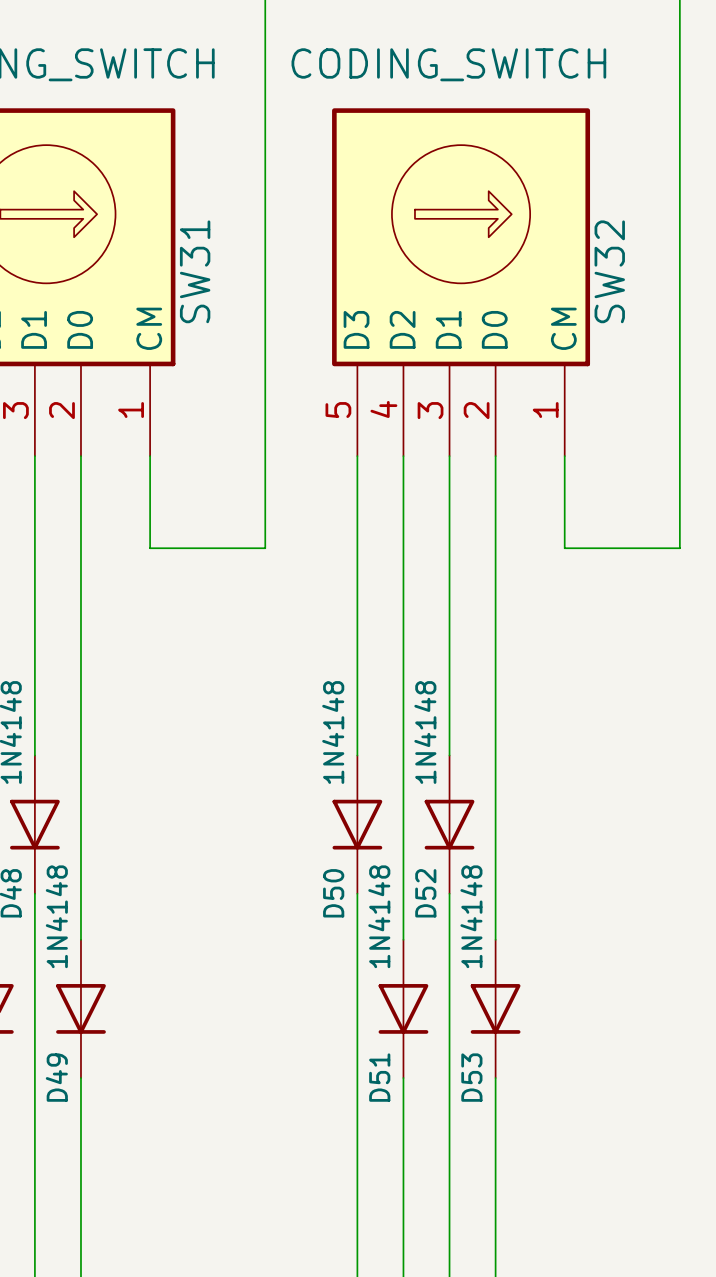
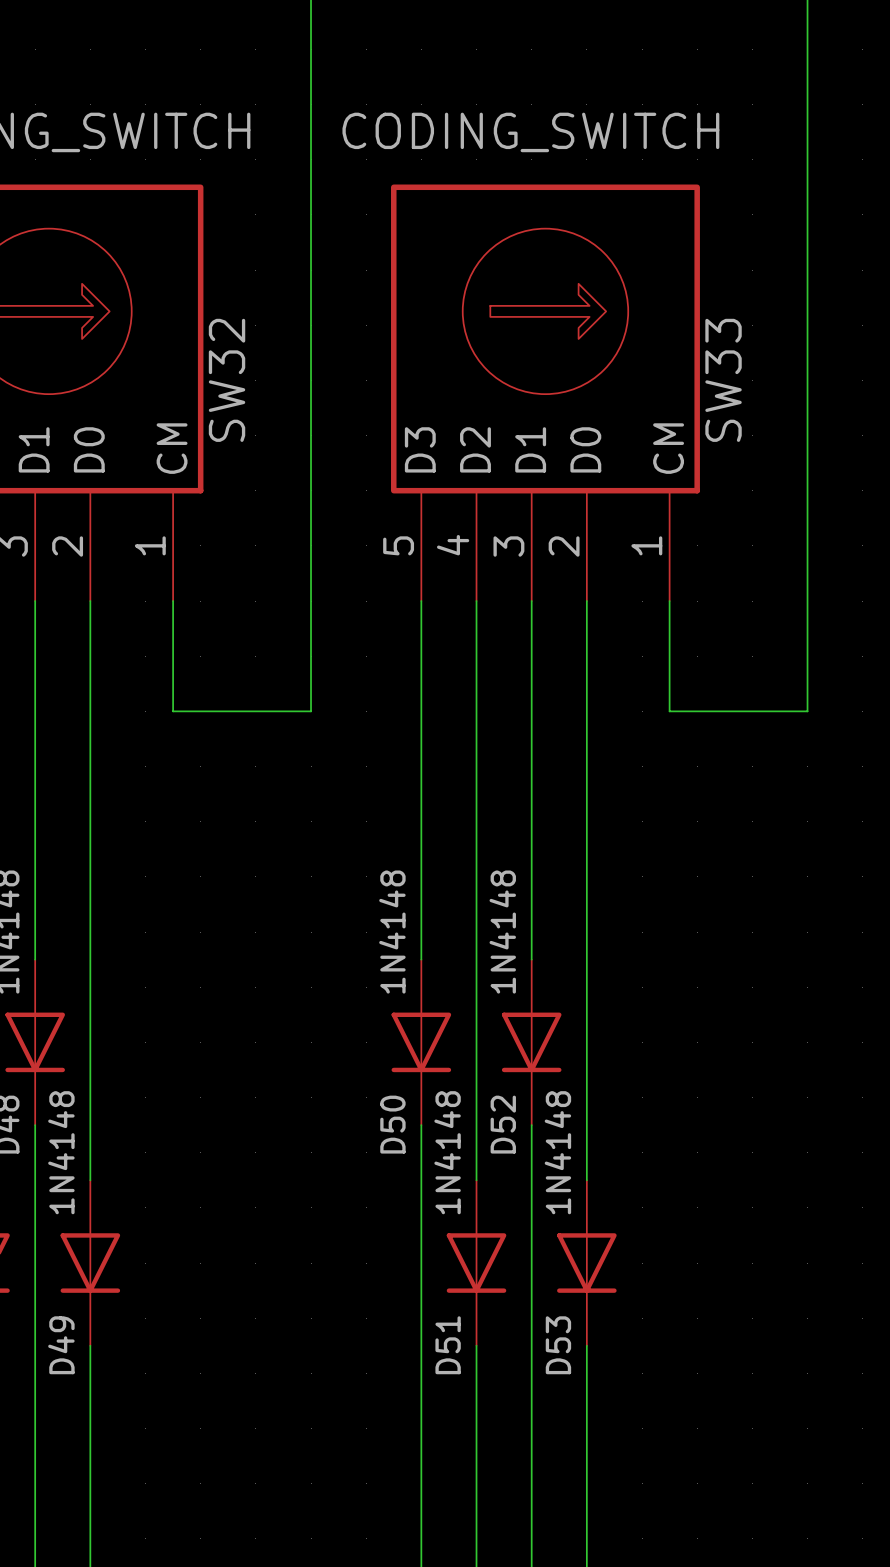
SW31 name: SW31 (195, 271) -> SW32 (227, 380)
SW32 name: SW32 (609, 271) -> SW33 (723, 380)

